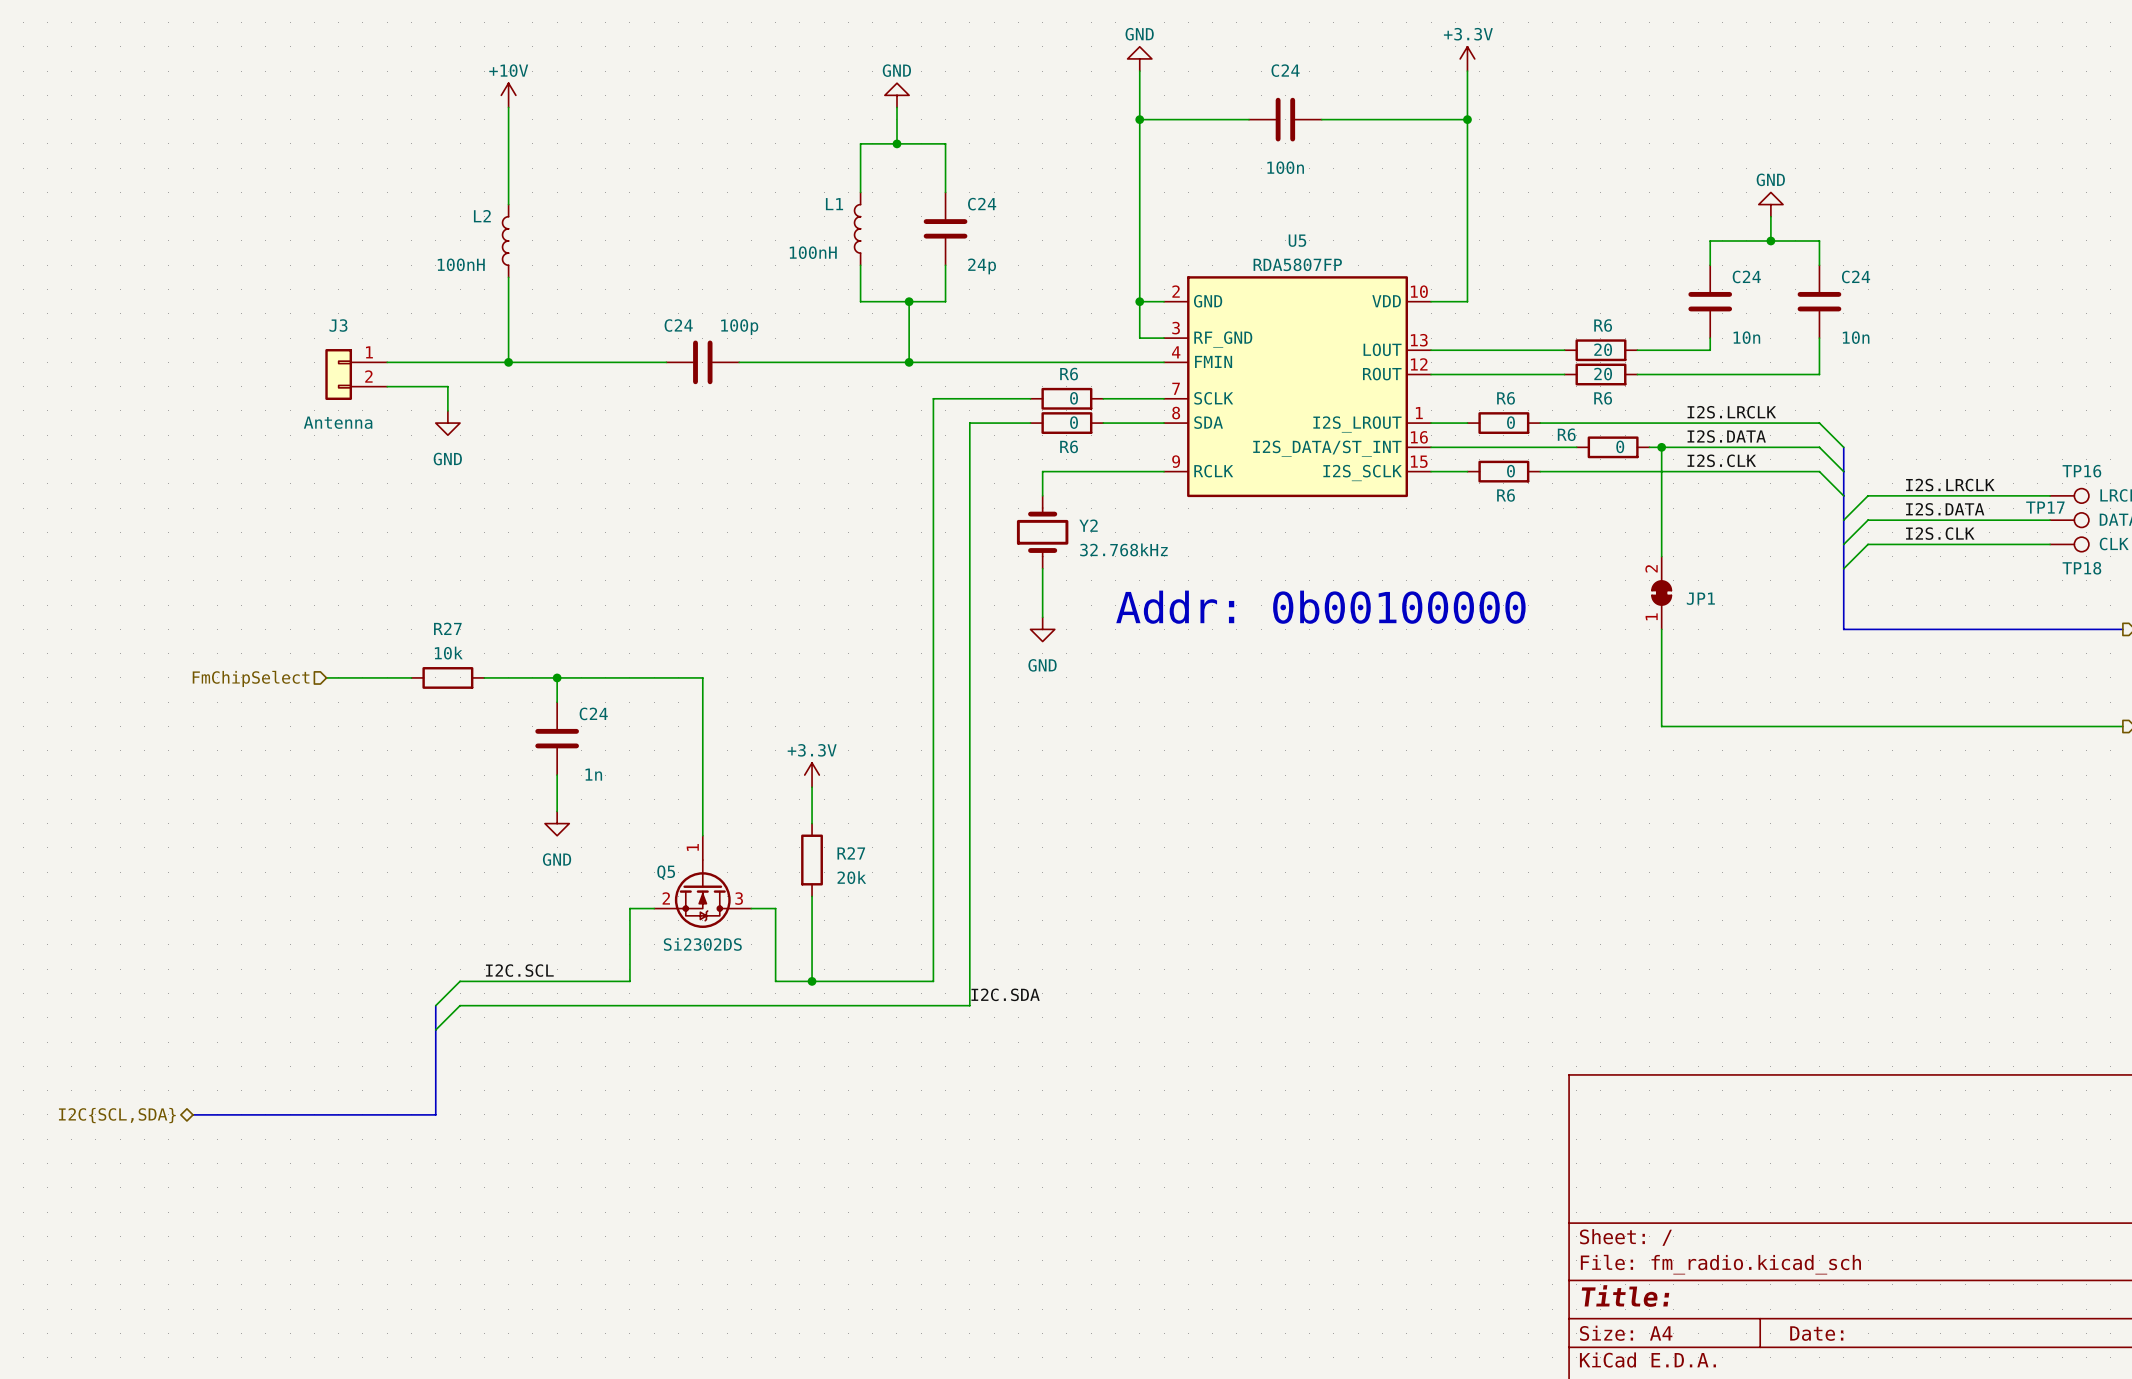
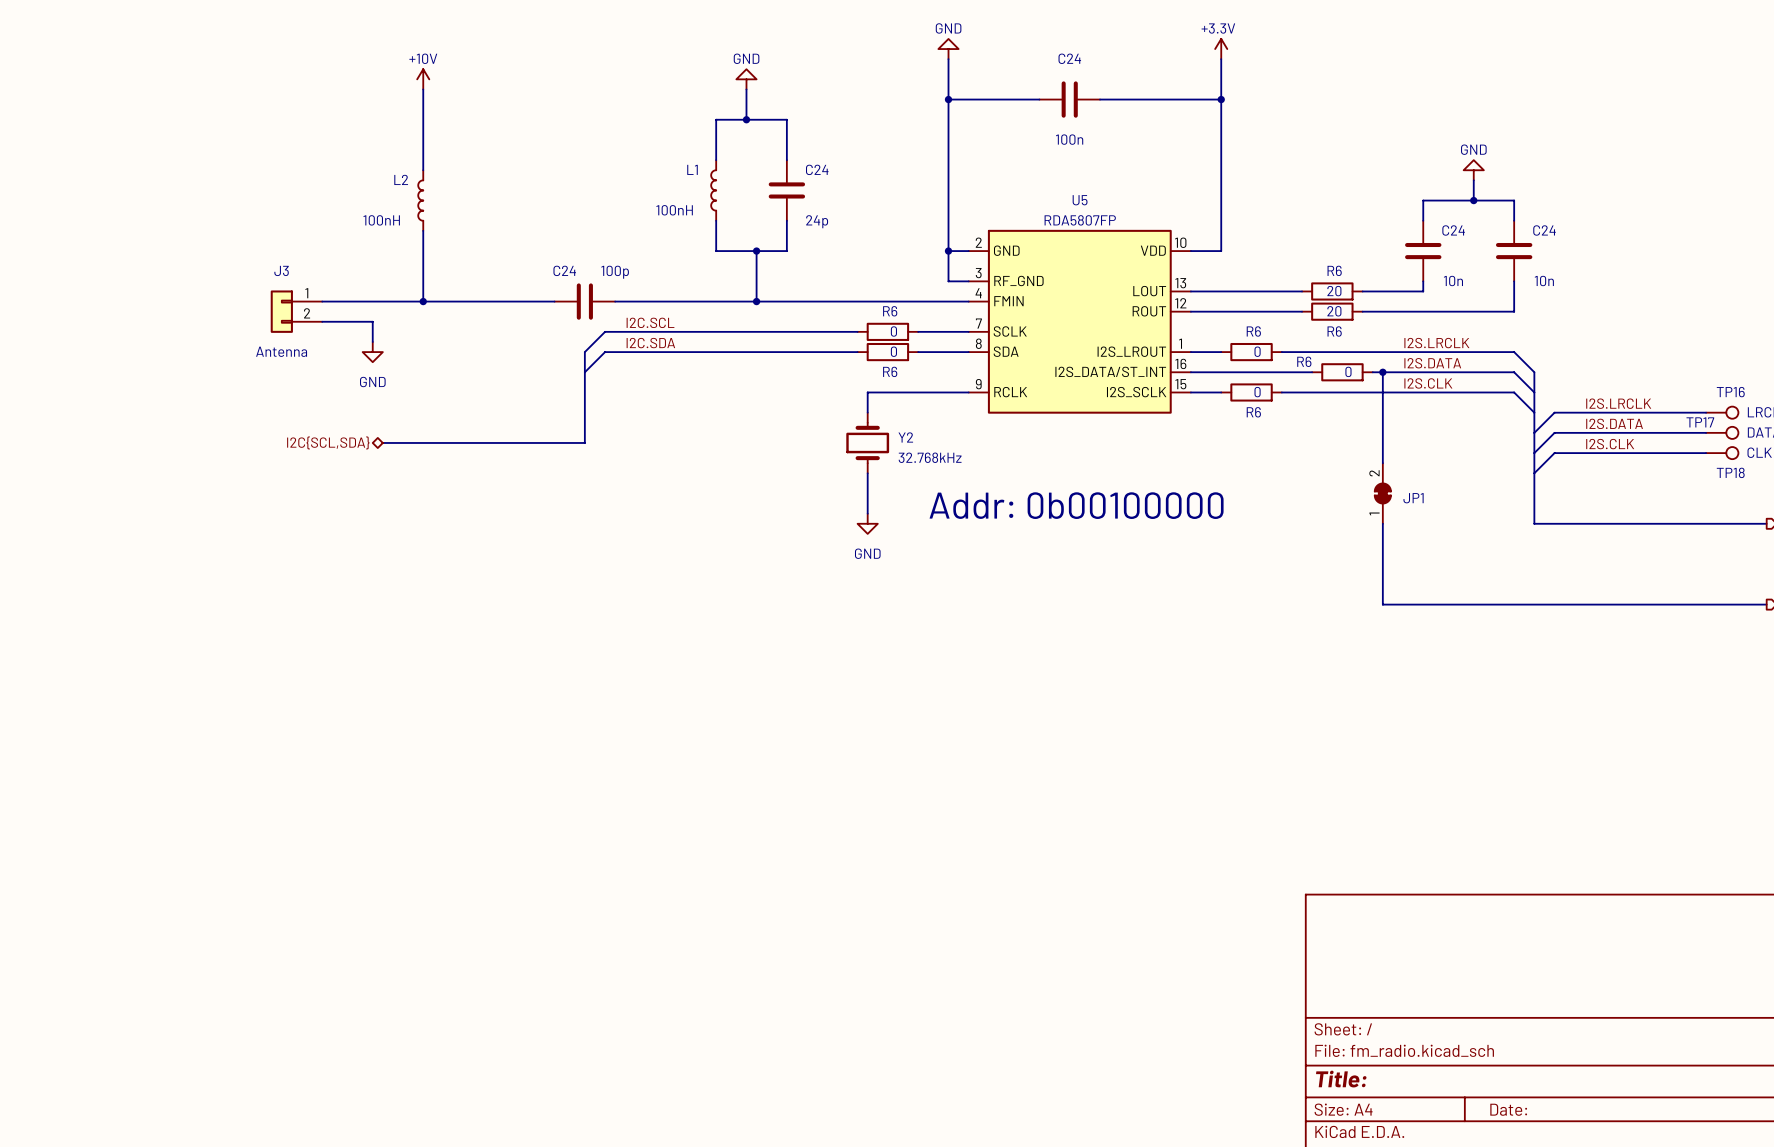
label: none -> I2C.SCL (650, 322)
wire: (933, 398) (933, 981) (775, 981) (775, 908) (751, 908) -> (776, 331) (605, 331) (584, 352)
label: none -> I2C.SDA (650, 343)
bus: none -> (584, 352) (584, 442) (382, 442)
wire: (969, 423) (969, 1005) (460, 1005) (435, 1029) -> (807, 352) (605, 352) (584, 372)
hierarchical label: none -> I2C{SCL,SDA} (328, 442)
wire: (326, 677) (411, 677) -> none
R27: 10k (447, 677) -> none
wire: (484, 677) (702, 677) (702, 835) -> none
wire: (557, 677) (557, 702) -> none
junction: (557, 677) -> none
hierarchical label: FmChipSelect (251, 678) -> none
C24: 1n (557, 738) -> none
wire: (557, 775) (557, 811) -> none
power symbol: +3.3V (812, 775) -> none
wire: (812, 787) (812, 823) -> none
power symbol: GND (557, 823) -> none
R27: 20k (812, 860) -> none
Q5: Si2302DS (702, 881) -> none
wire: (812, 896) (812, 981) -> none
wire: (654, 908) (629, 908) (629, 981) (460, 981) (435, 1005) -> none
label: I2C.SCL (519, 970) -> none
junction: (812, 981) -> none
label: I2C.SDA (1005, 994) -> none
bus: (435, 1005) (435, 1114) (193, 1114) -> none
hierarchical label: I2C{SCL,SDA} (117, 1115) -> none

